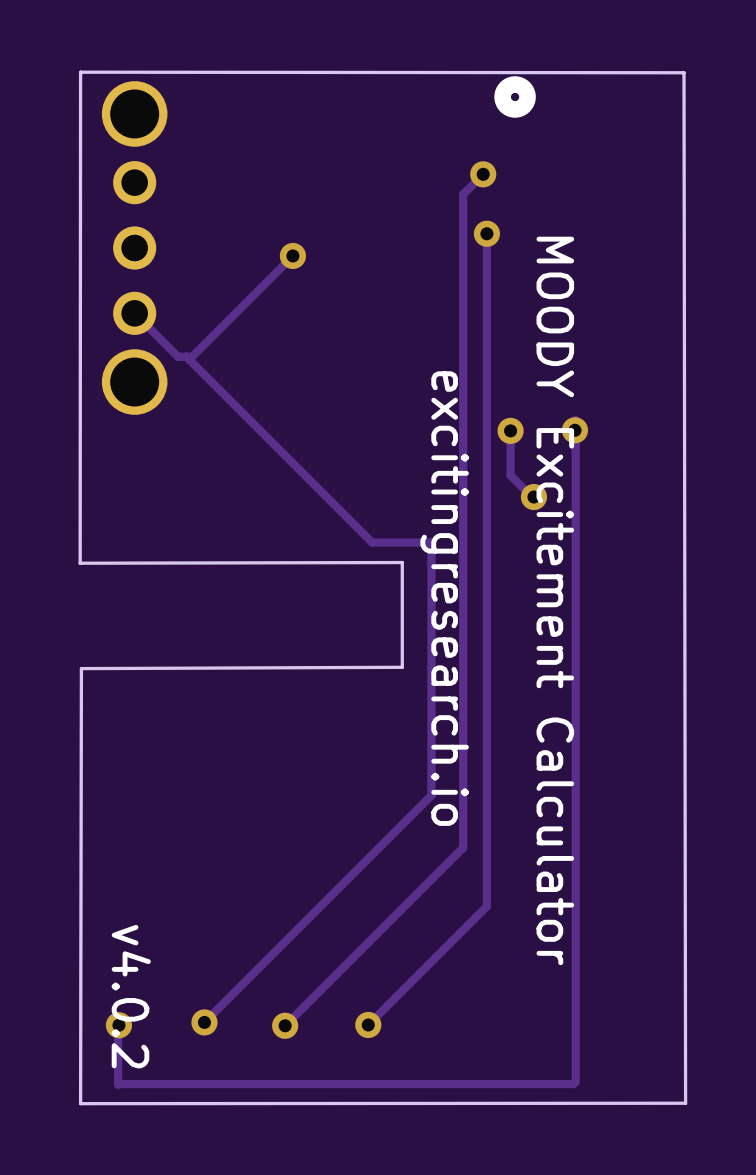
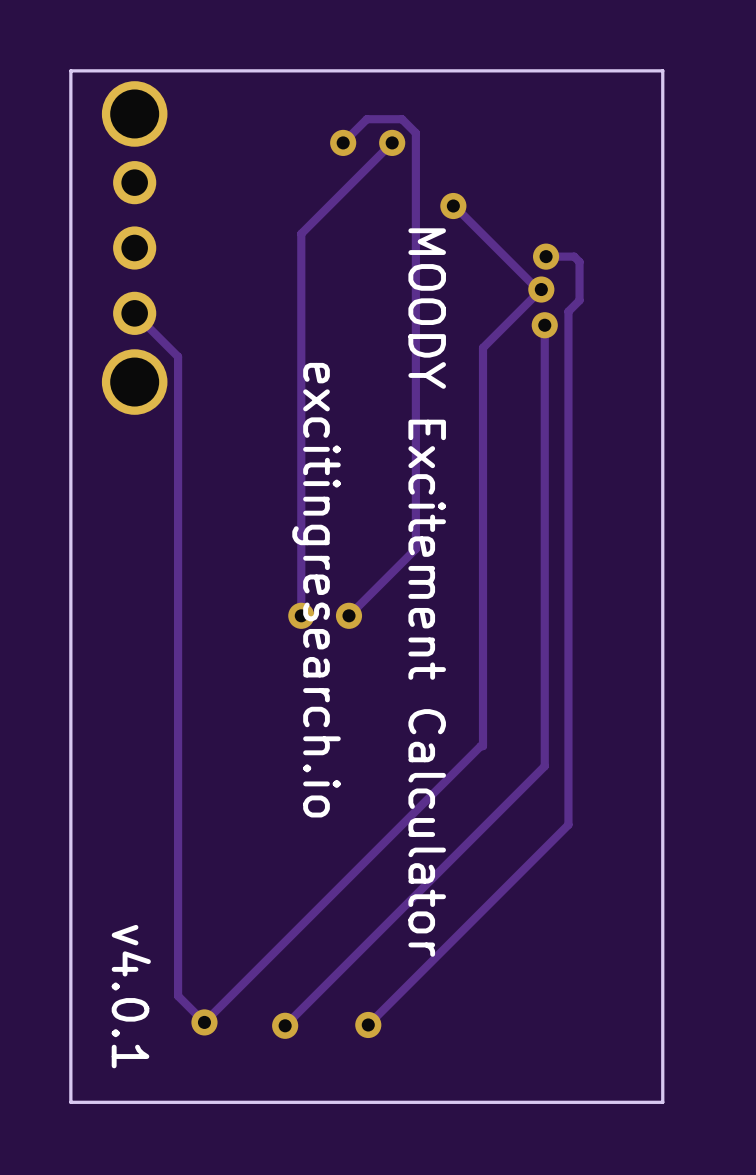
board edge: (80, 72) (684, 72) (685, 1103) (80, 1103) (81, 668) (402, 667) (402, 562) (80, 563) (80, 72) -> (662, 70) (662, 1102) (70, 1102) (70, 70) (662, 70)
part: (515, 96) -> none
track: none -> (343, 142) (366, 119) (402, 119) (415, 133) (415, 548) (349, 615)
via: none -> (343, 142)
track: none -> (392, 142) (301, 233) (301, 615)
via: none -> (392, 142)
track: (483, 174) (463, 194) (463, 847) -> (544, 325) (544, 766) (463, 847)
via: (483, 174) -> none
via: none -> (453, 206)
track: (486, 233) (486, 906) -> (546, 256) (574, 256) (579, 261) (579, 300) (568, 311) (568, 824) (486, 906)
via: (486, 233) -> none
track: (292, 255) (192, 356) (178, 356) -> (204, 1022) (178, 996) (178, 356)
via: (292, 255) -> none
via: none -> (546, 256)
via: none -> (541, 289)
via: none -> (544, 325)
track: (186, 356) (372, 542) (431, 542) (431, 795) -> (453, 205) (537, 289) (541, 289) (483, 347) (483, 746) (480, 746) (431, 795)
track: (575, 419) (575, 1081) -> none
track: (510, 430) (510, 475) (533, 497) -> none
via: (510, 430) -> none
via: (574, 430) -> none
via: (533, 497) -> none
text position: excitingresearch.io (444, 598) -> excitingresearch.io (316, 590)
text position: MOODY Excitement Calculator (555, 600) -> MOODY Excitement Calculator (427, 592)
via: none -> (301, 615)
via: none -> (349, 615)
text: v4.0.2 (131, 996) -> v4.0.1 (131, 996)
track: (118, 1016) (118, 1084) -> none
via: (118, 1025) -> none
track: (574, 1083) (119, 1083) -> none

